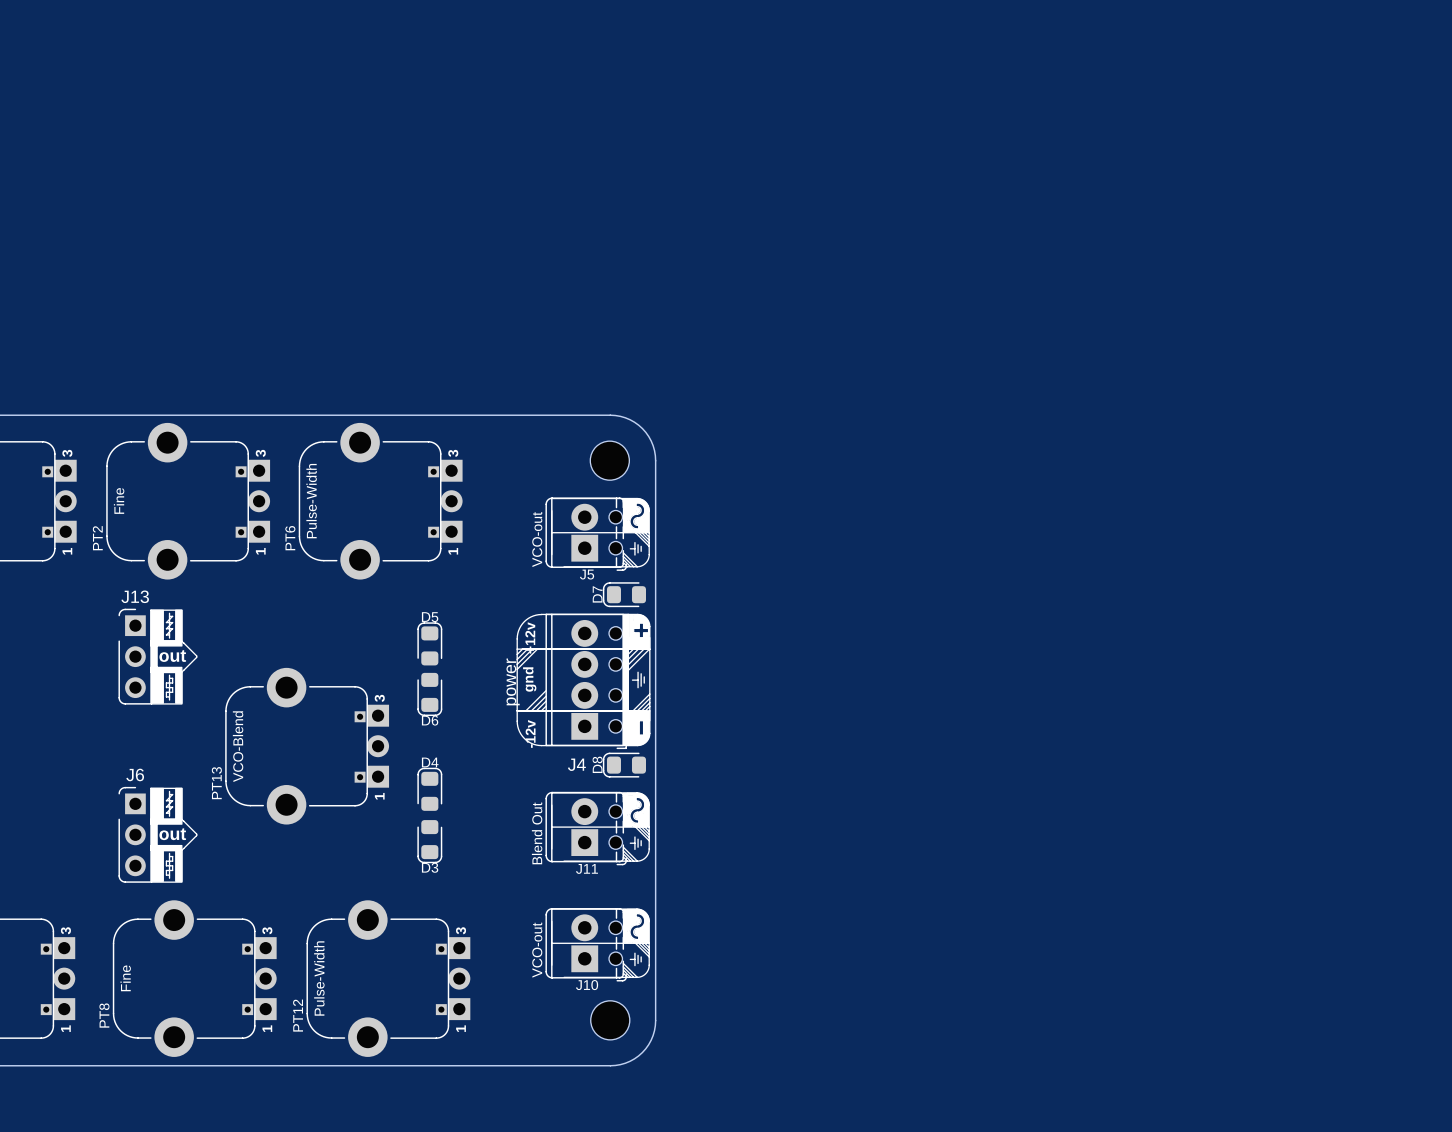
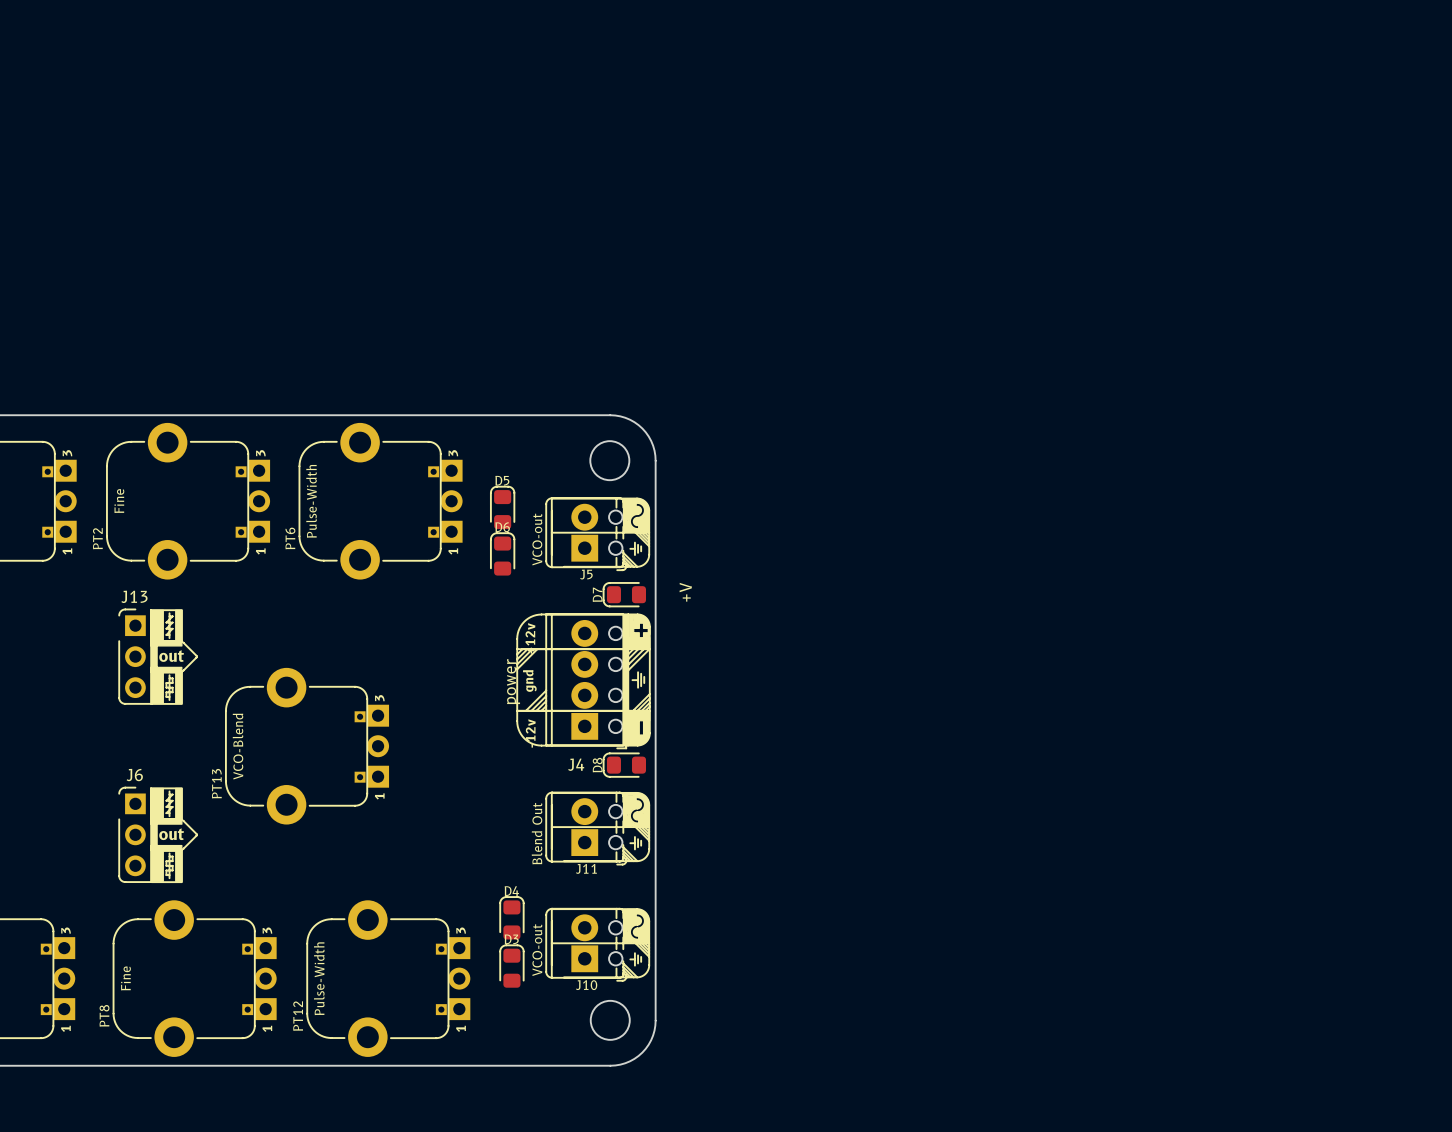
text: none -> +V (685, 592)
D5 position: (429, 643) -> (502, 507)
D6 rotation: 0° (429, 694) -> 180° (502, 554)
D6 position: (429, 694) -> (502, 554)
D4 position: (429, 789) -> (511, 917)
D3 rotation: 0° (429, 841) -> 180° (511, 966)
D3 position: (429, 841) -> (511, 966)

